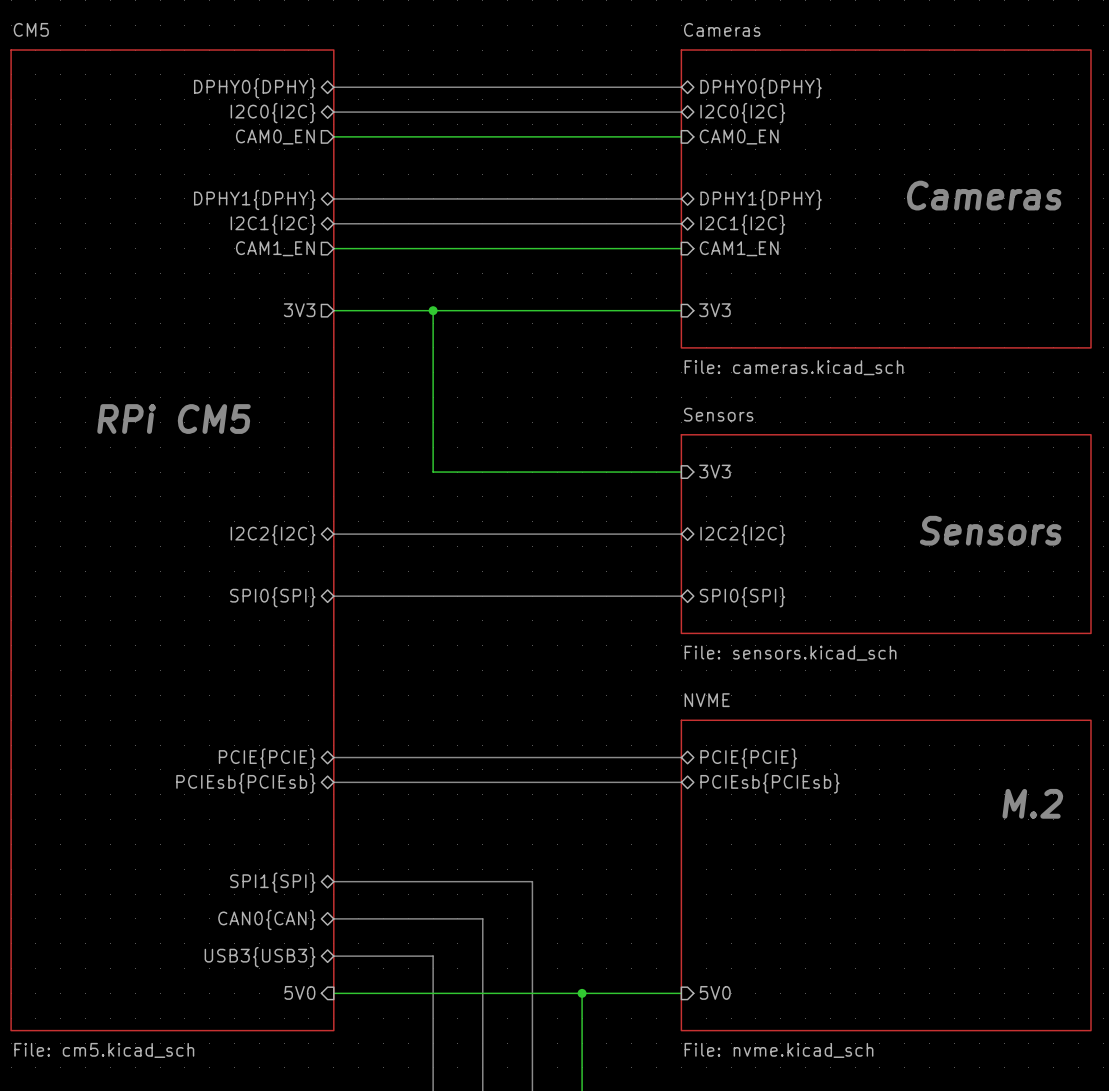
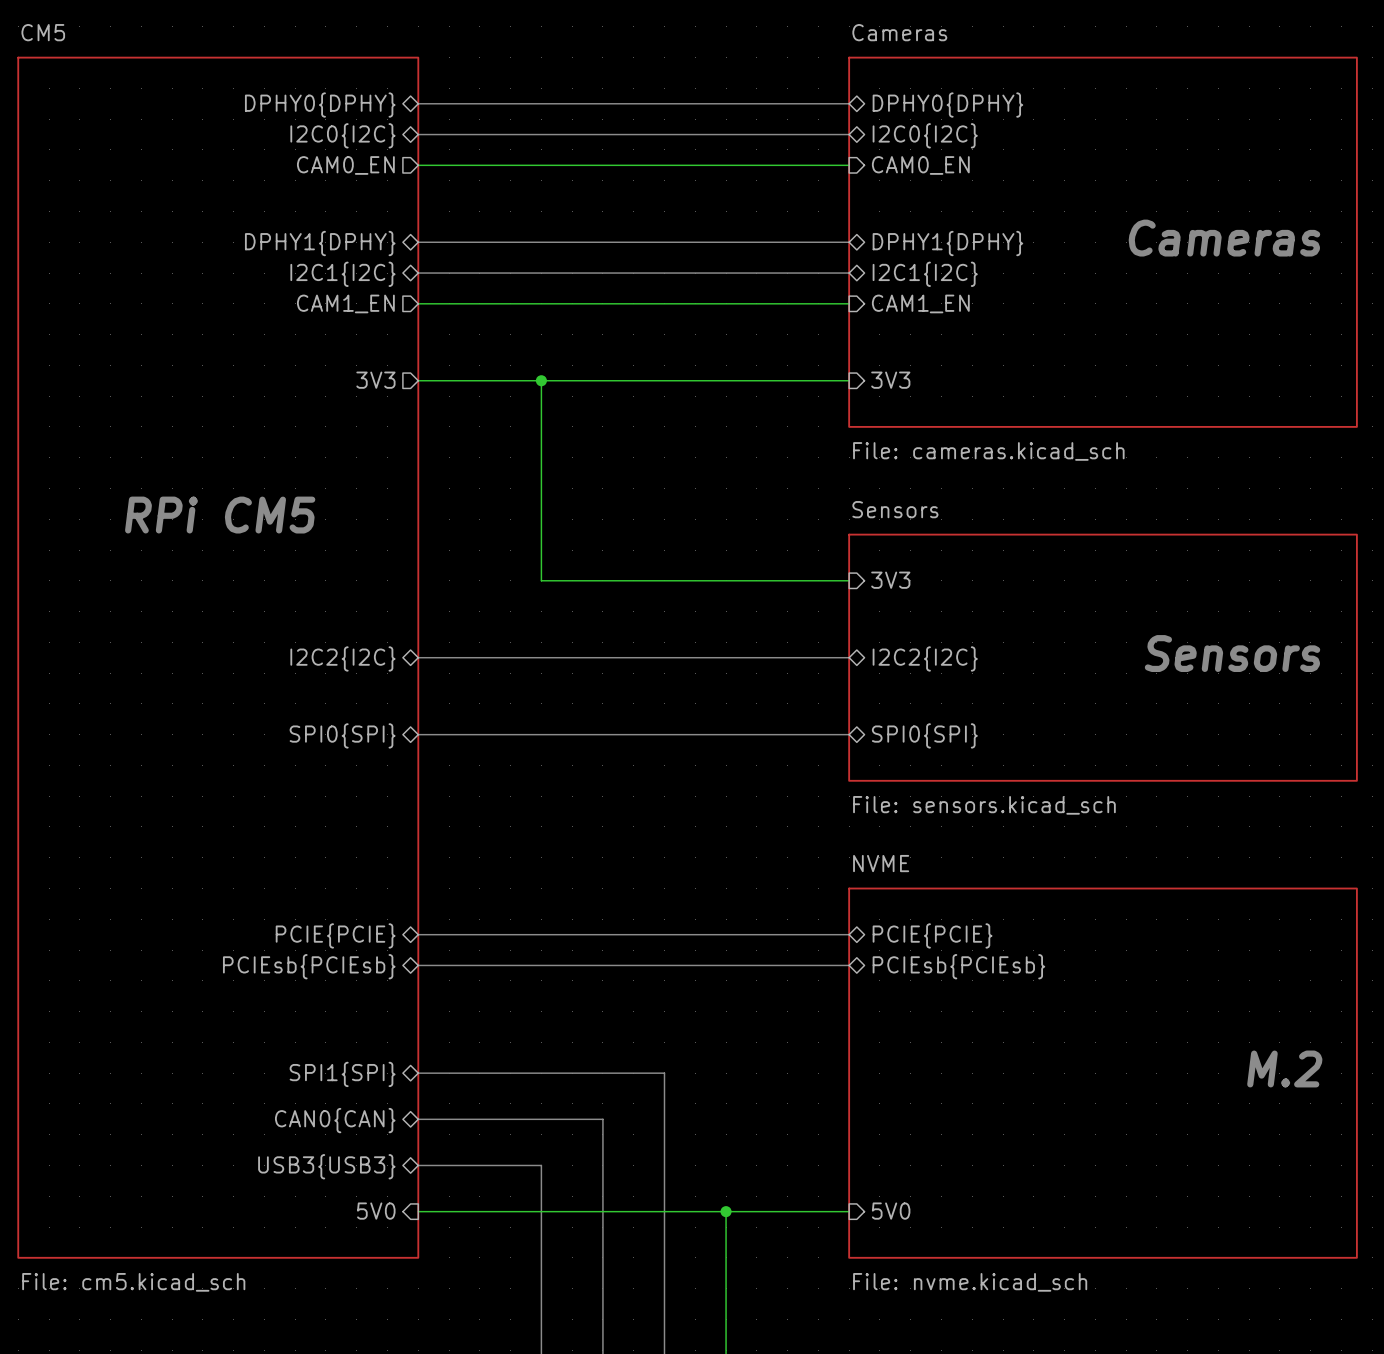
sheet CM5 shape: [10, 49, 335, 1032] -> [17, 56, 420, 1259]
sheet NVME shape: [680, 719, 1092, 1032] -> [848, 887, 1358, 1259]
text position: M.2 (1032, 803) -> M.2 (1284, 1068)
bus: (333, 881) (532, 881) -> (418, 1073) (664, 1073) (664, 1088)
sheet pin position: SPI1{SPI} (272, 882) -> SPI1{SPI} (342, 1074)
bus: (333, 918) (482, 918) -> (418, 1119) (602, 1119) (602, 1134)
sheet pin position: CAN0{CAN} (266, 919) -> CAN0{CAN} (335, 1120)
bus: (333, 956) (433, 956) -> (418, 1165) (541, 1165) (541, 1180)
sheet pin position: USB3{USB3} (260, 957) -> USB3{USB3} (326, 1166)
wire: none -> (726, 1211) (726, 1227)
sheet pin position: 5V0 (299, 992) -> 5V0 (376, 1211)
sheet pin position: 5V0 (715, 992) -> 5V0 (891, 1211)
wire: (333, 993) (681, 993) -> (418, 1211) (849, 1211)
junction position: (582, 993) -> (726, 1211)

